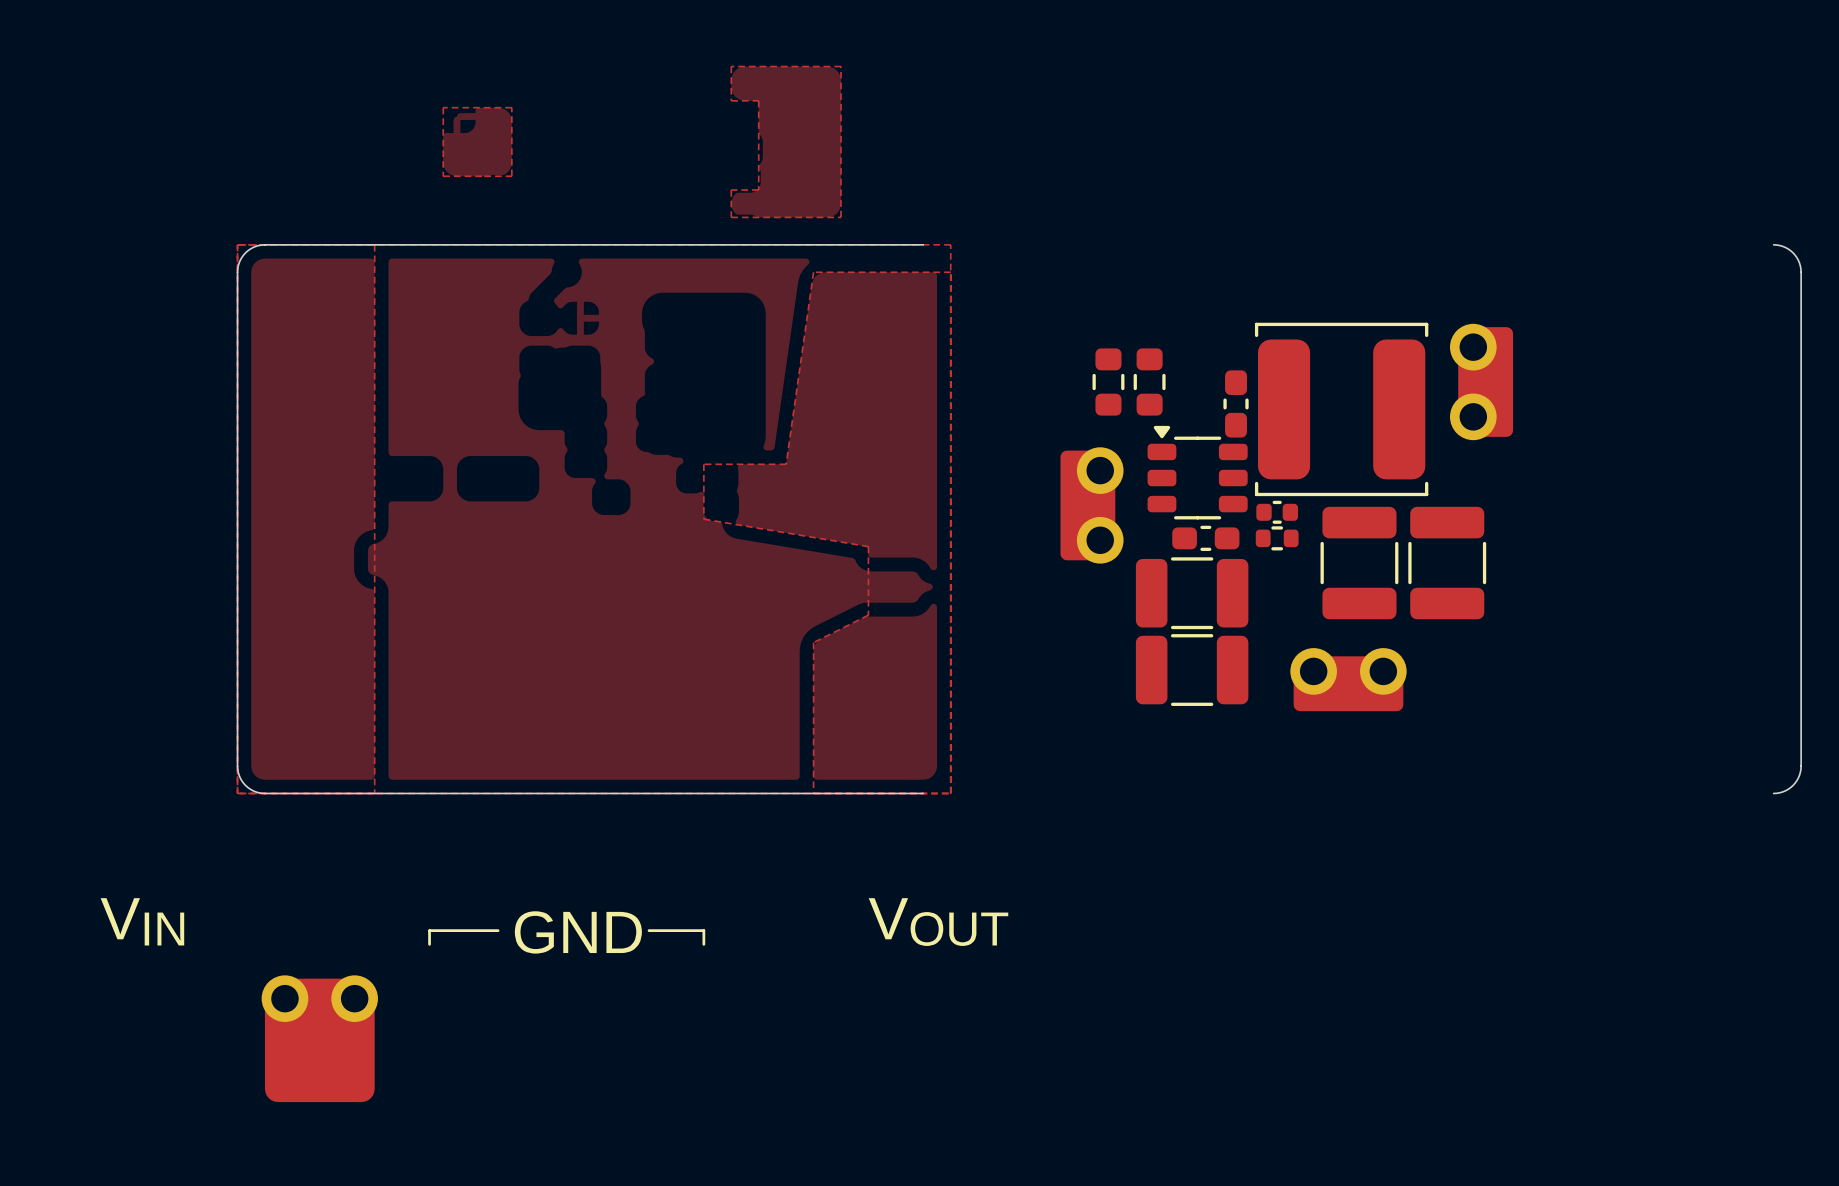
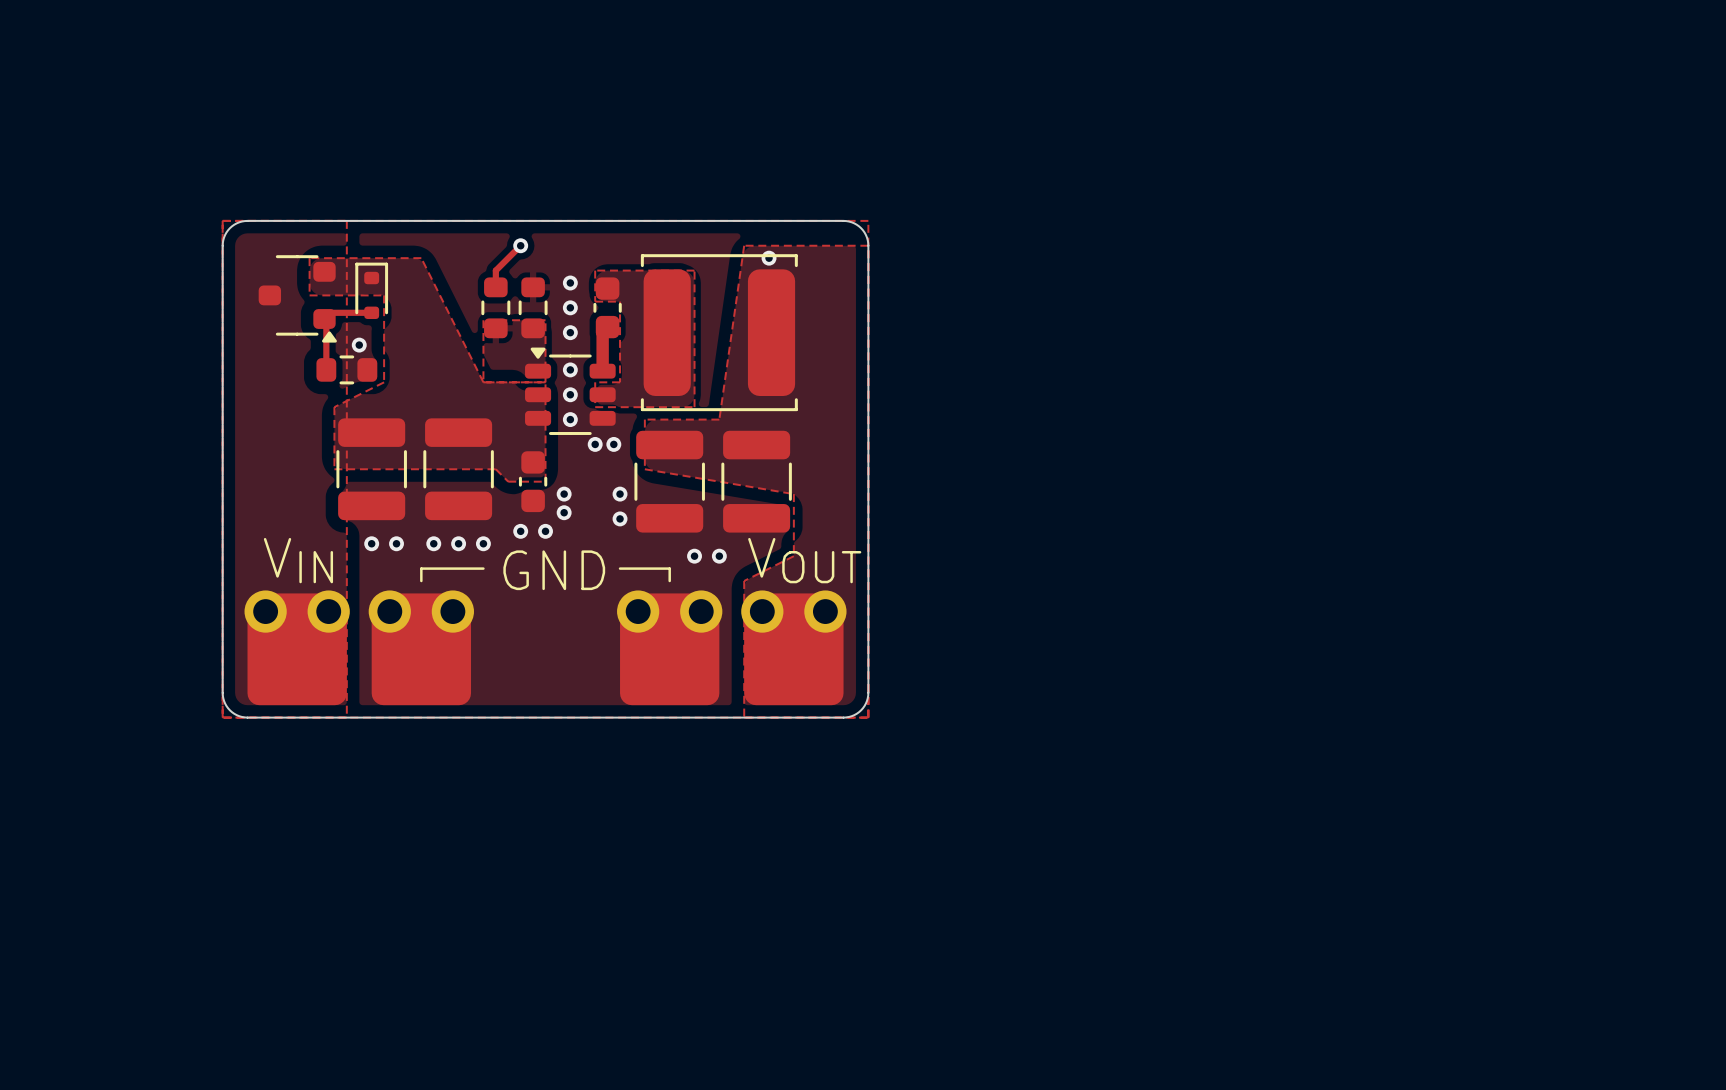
zone outline: (731, 66) (841, 66) (841, 217) (731, 217) (731, 189) (758, 189) (758, 100) (731, 100) (731, 66) -> (595, 270) (694, 270) (694, 407) (595, 407) (595, 382) (620, 382) (620, 301) (595, 301) (595, 270)
zone outline: (443, 107) (443, 176) (511, 176) (511, 107) (443, 107) -> none
board edge: none -> (843, 220) (851, 222) (861, 228) (866, 237) (868, 245) (868, 692) (866, 700) (861, 710) (854, 715) (843, 717)
board edge: (1773, 244) (1782, 246) (1793, 252) (1799, 263) (1801, 272) (1801, 766) (1799, 775) (1793, 785) (1782, 791) (1773, 793) -> none
track: none -> (520, 245) (495, 270) (495, 287)
via: none -> (520, 245)
via: none -> (769, 258)
via: none -> (570, 282)
part: none -> (371, 290)
part: none -> (297, 298)
part: none -> (495, 307)
part: none -> (533, 307)
via: none -> (570, 307)
part: none -> (607, 307)
track: none -> (371, 312) (330, 312) (324, 319) (326, 320) (326, 369)
track: none -> (607, 327) (602, 332) (602, 371)
via: none -> (570, 332)
via: none -> (359, 345)
part: (1108, 382) -> none
part: (1149, 382) -> none
part: (1481, 382) -> none
part: (1236, 403) -> none
part: none -> (346, 369)
via: none -> (570, 369)
part position: (1341, 409) -> (719, 332)
zone outline: none -> (483, 382) (483, 320) (545, 320) (545, 481) (508, 481) (495, 469) (334, 469) (334, 407) (384, 382) (384, 295) (309, 295) (309, 258) (421, 258) (483, 382)
zone outline: none -> (483, 382) (545, 382)
part: none -> (570, 391)
via: none -> (570, 394)
via: none -> (570, 419)
part: (1197, 472) -> none
via: none -> (595, 444)
via: none -> (613, 444)
part: (1092, 505) -> none
part: (1277, 512) -> none
part: none -> (371, 469)
part: none -> (458, 469)
part: none -> (533, 481)
part: none -> (669, 481)
part: none -> (756, 481)
part: (1205, 538) -> none
part: (1277, 538) -> none
via: none -> (564, 494)
via: none -> (620, 494)
part: (1359, 563) -> none
part: (1447, 563) -> none
via: none -> (564, 512)
via: none -> (620, 518)
via: none -> (520, 531)
via: none -> (545, 531)
part: (1192, 593) -> none
via: none -> (371, 543)
via: none -> (396, 543)
via: none -> (433, 543)
via: none -> (458, 543)
via: none -> (483, 543)
via: none -> (694, 556)
via: none -> (719, 556)
part: (1192, 670) -> none
part: (1348, 679) -> none
part: none -> (297, 647)
part: none -> (421, 647)
part: none -> (669, 647)
part: none -> (793, 647)
text position: VIN (142, 921) -> VIN (298, 560)
text position: VOUT (938, 922) -> VOUT (804, 560)
line: (498, 930) (429, 930) (429, 944) -> (483, 568) (421, 568) (421, 581)
line: (648, 930) (703, 930) (703, 944) -> (620, 568) (669, 568) (669, 581)
text position: GND (578, 932) -> GND (554, 570)
part: (319, 1038) -> none

